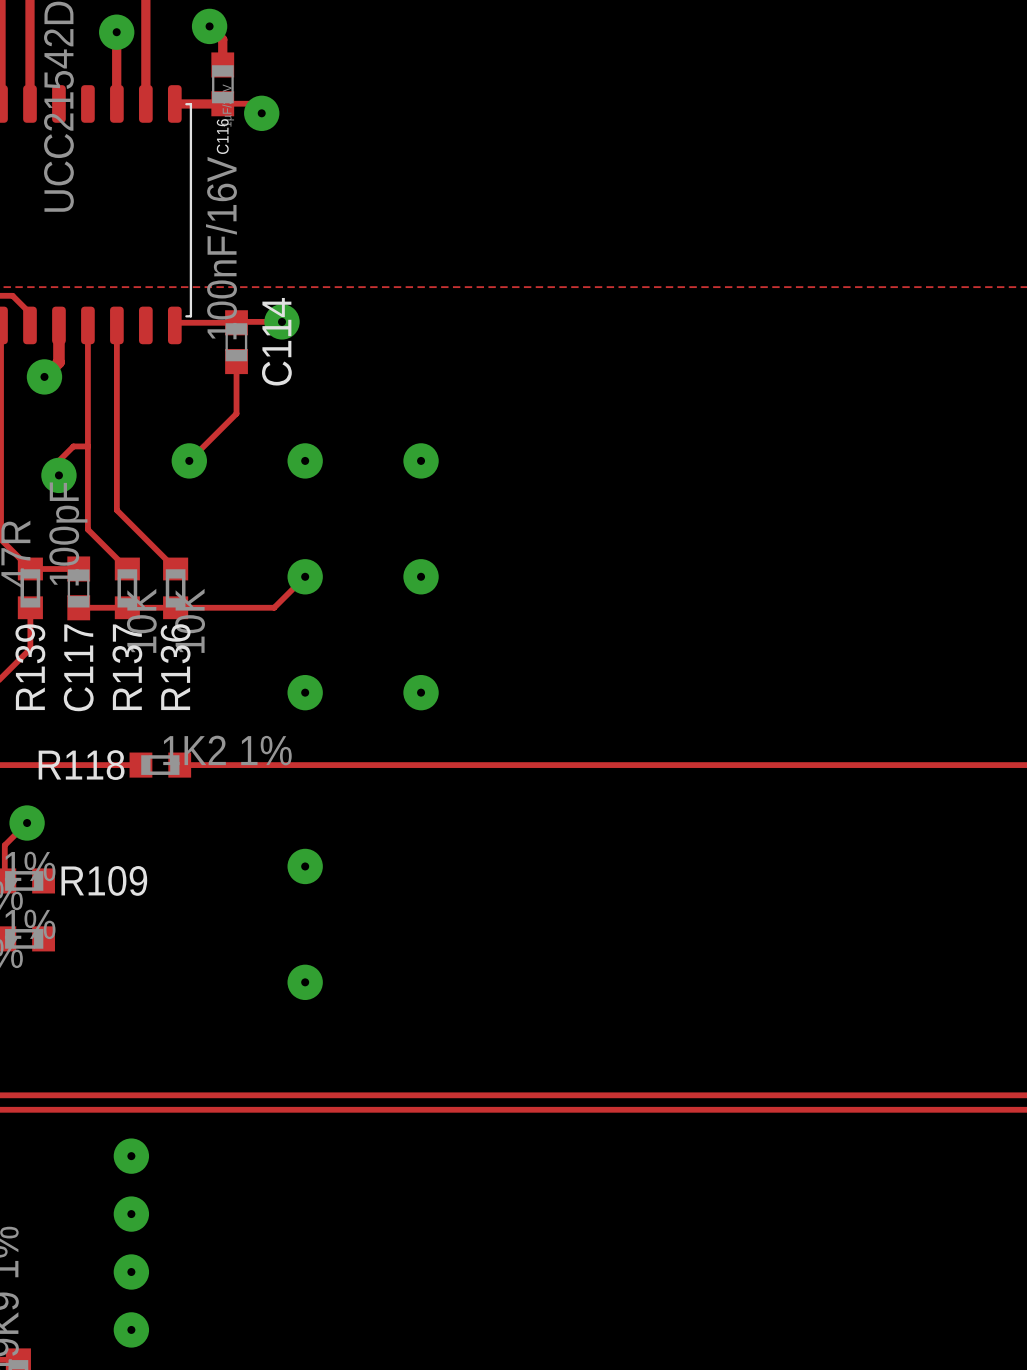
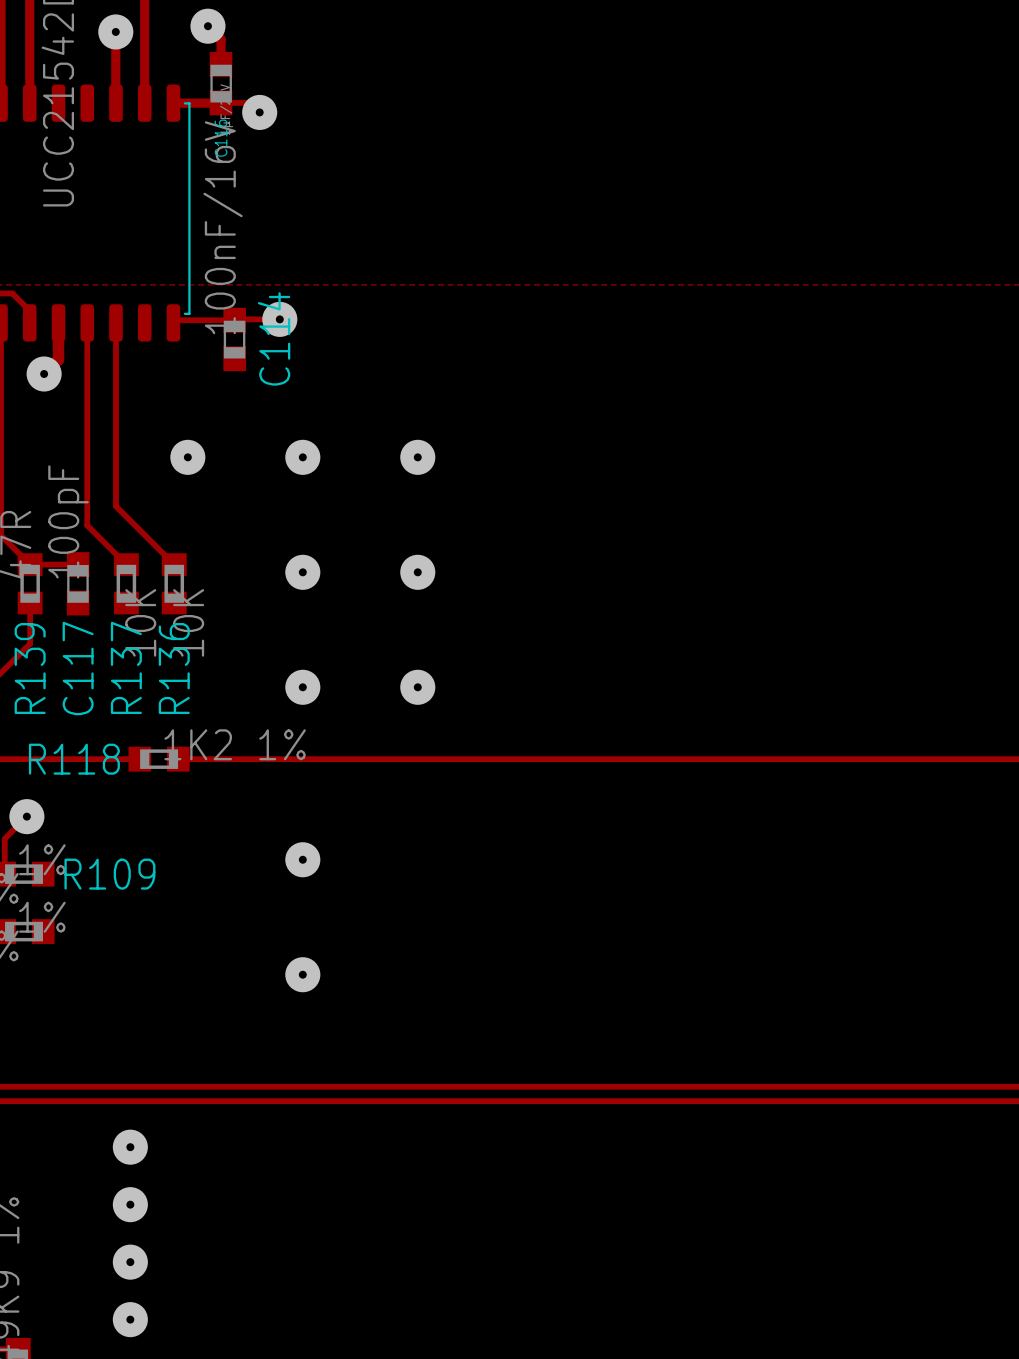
track: (236, 361) (236, 413) (189, 460) -> none
track: (87, 446) (73, 446) (58, 460) (58, 475) -> none
via: (58, 475) -> none
track: (305, 576) (274, 607) (78, 607) -> none

